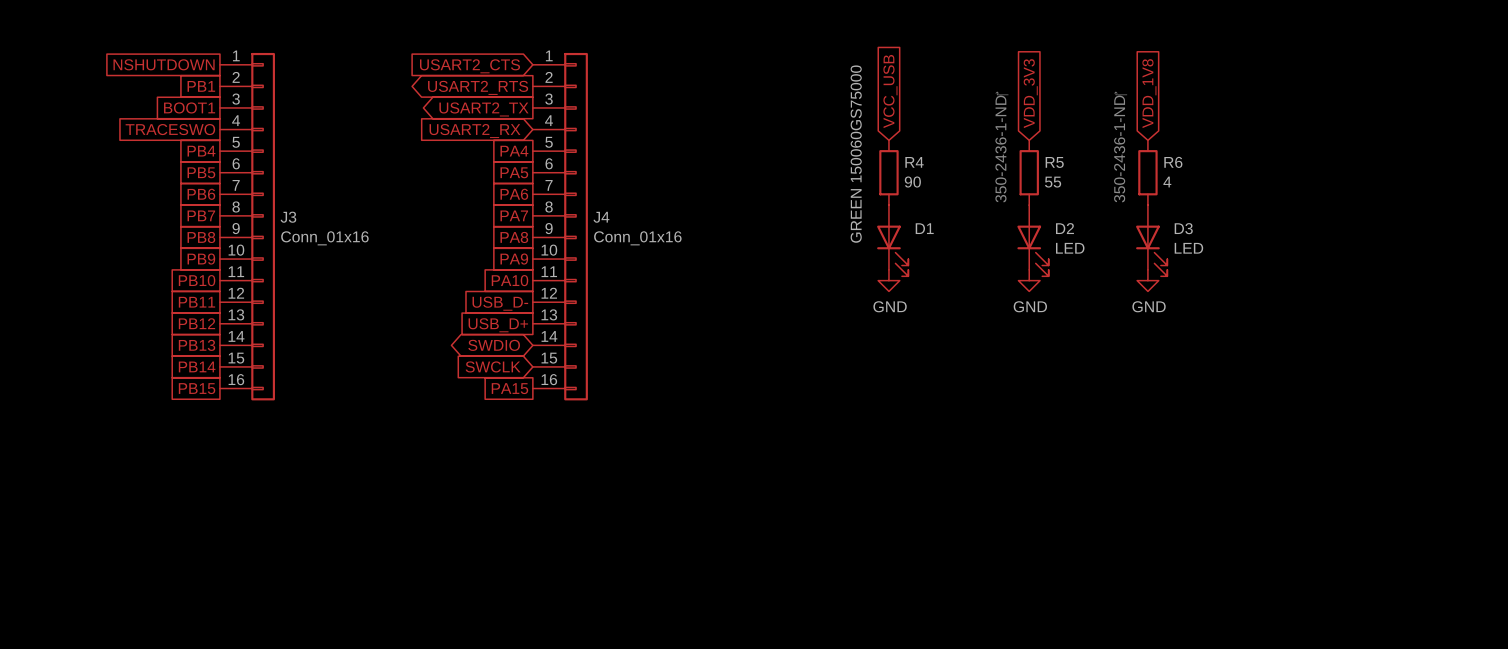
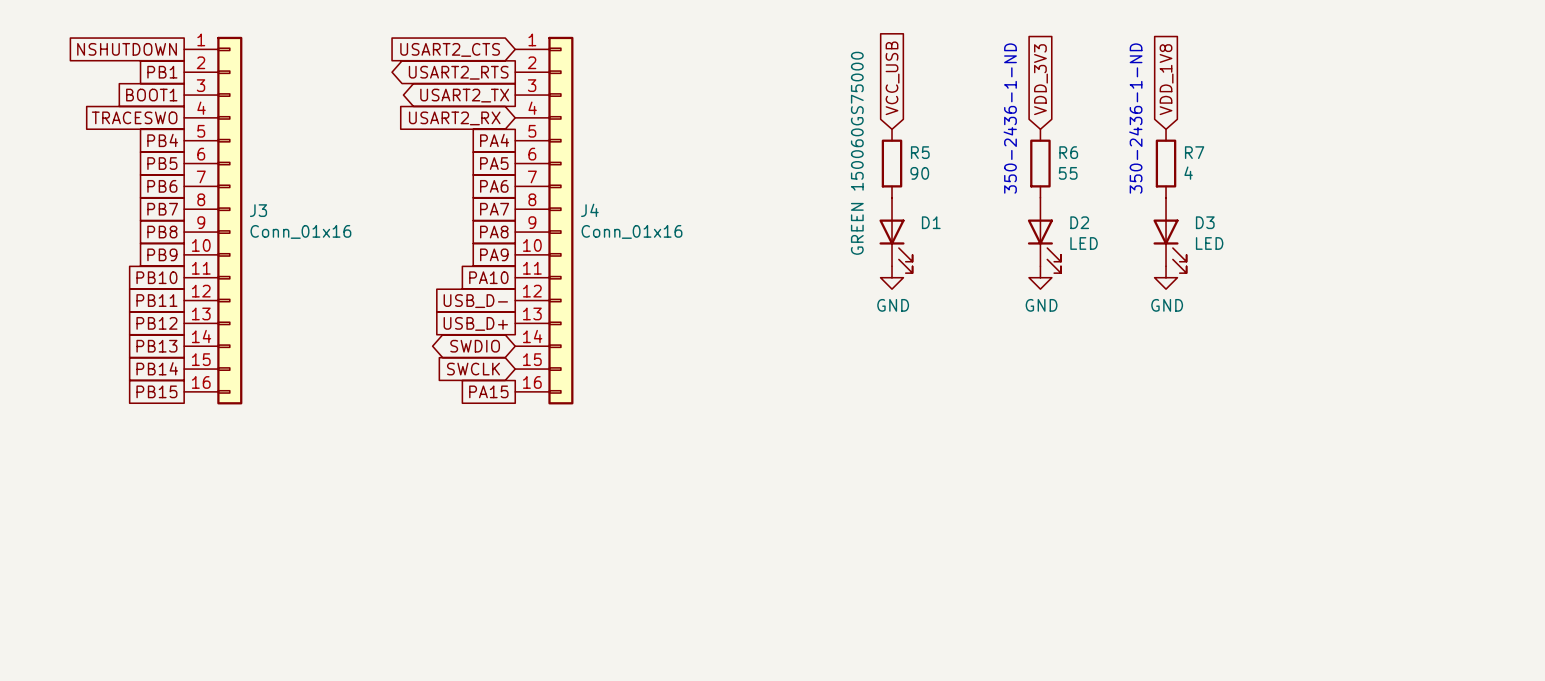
R4 name: R4 (914, 162) -> R5 (920, 152)
R5 name: R5 (1054, 162) -> R6 (1068, 152)
R6 name: R6 (1173, 162) -> R7 (1194, 152)

